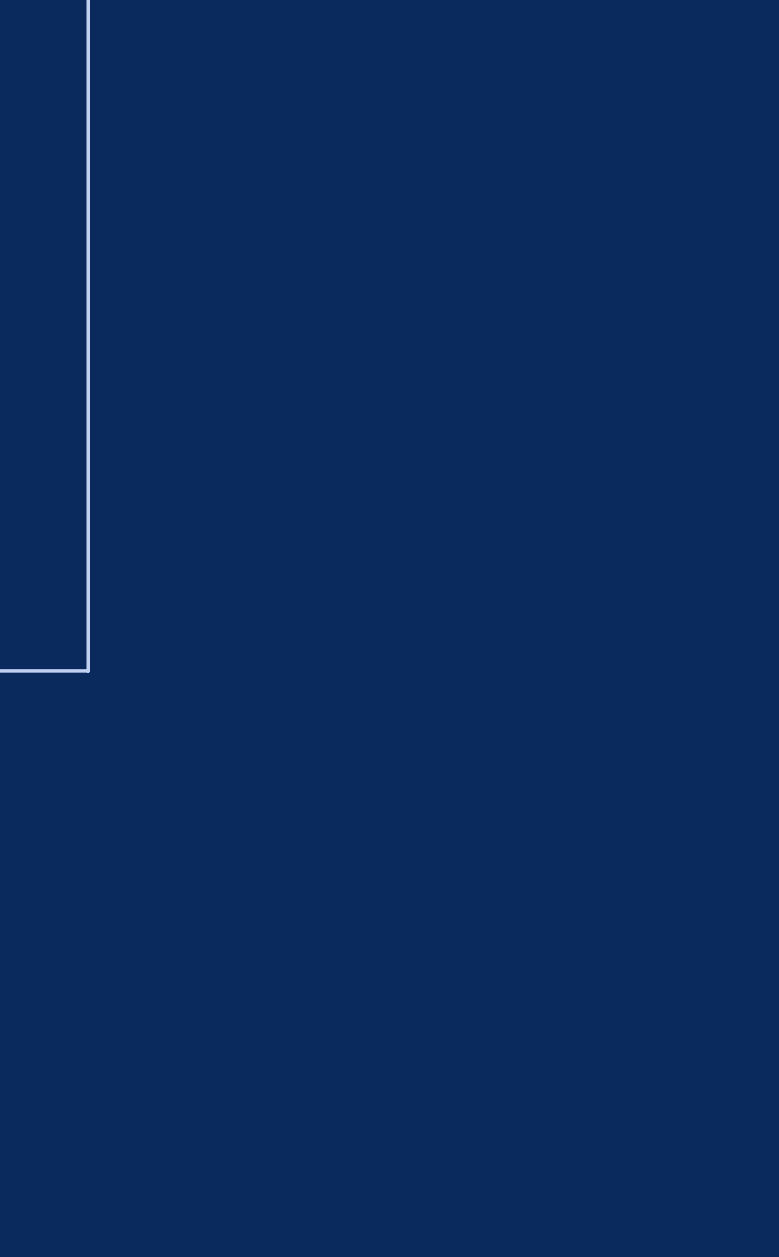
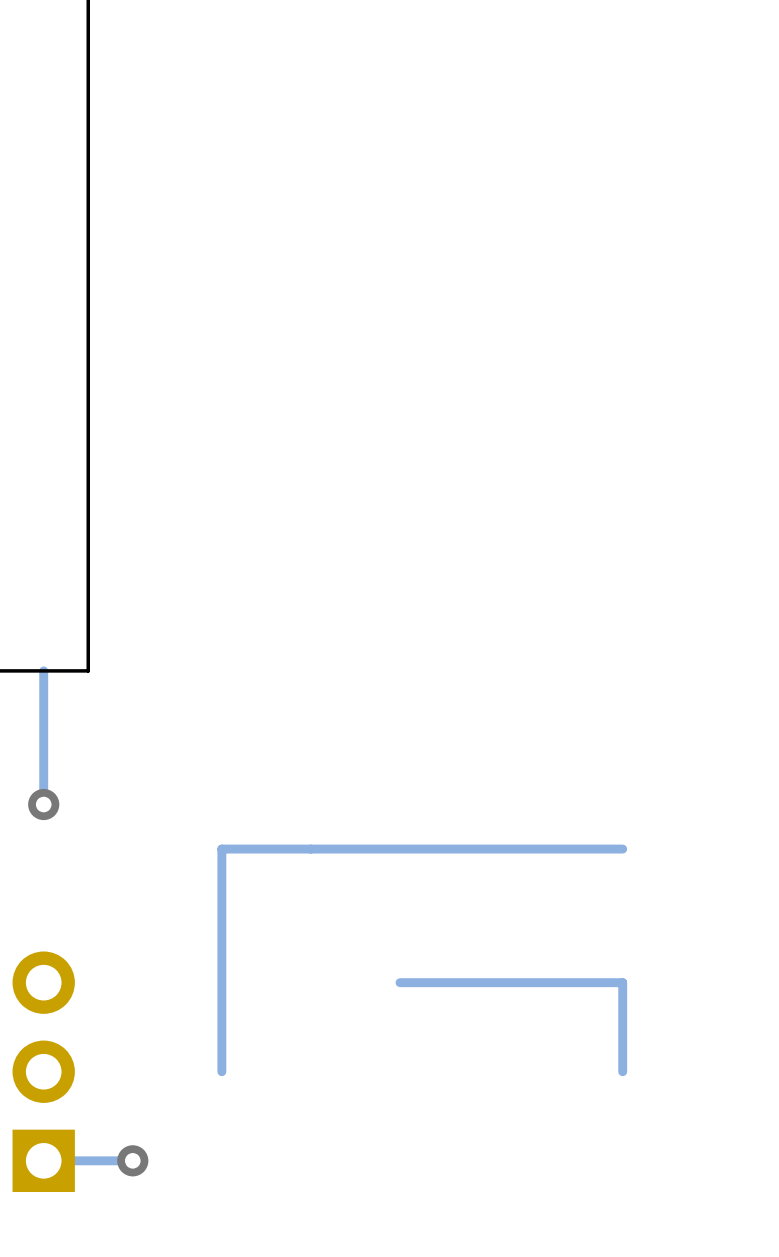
track: none -> (43, 670) (43, 804)
via: none -> (43, 804)
track: none -> (622, 849) (221, 849) (221, 1071)
track: none -> (400, 982) (622, 982) (622, 1071)
part: none -> (43, 1071)
track: none -> (132, 1160) (43, 1160)
via: none -> (132, 1160)

